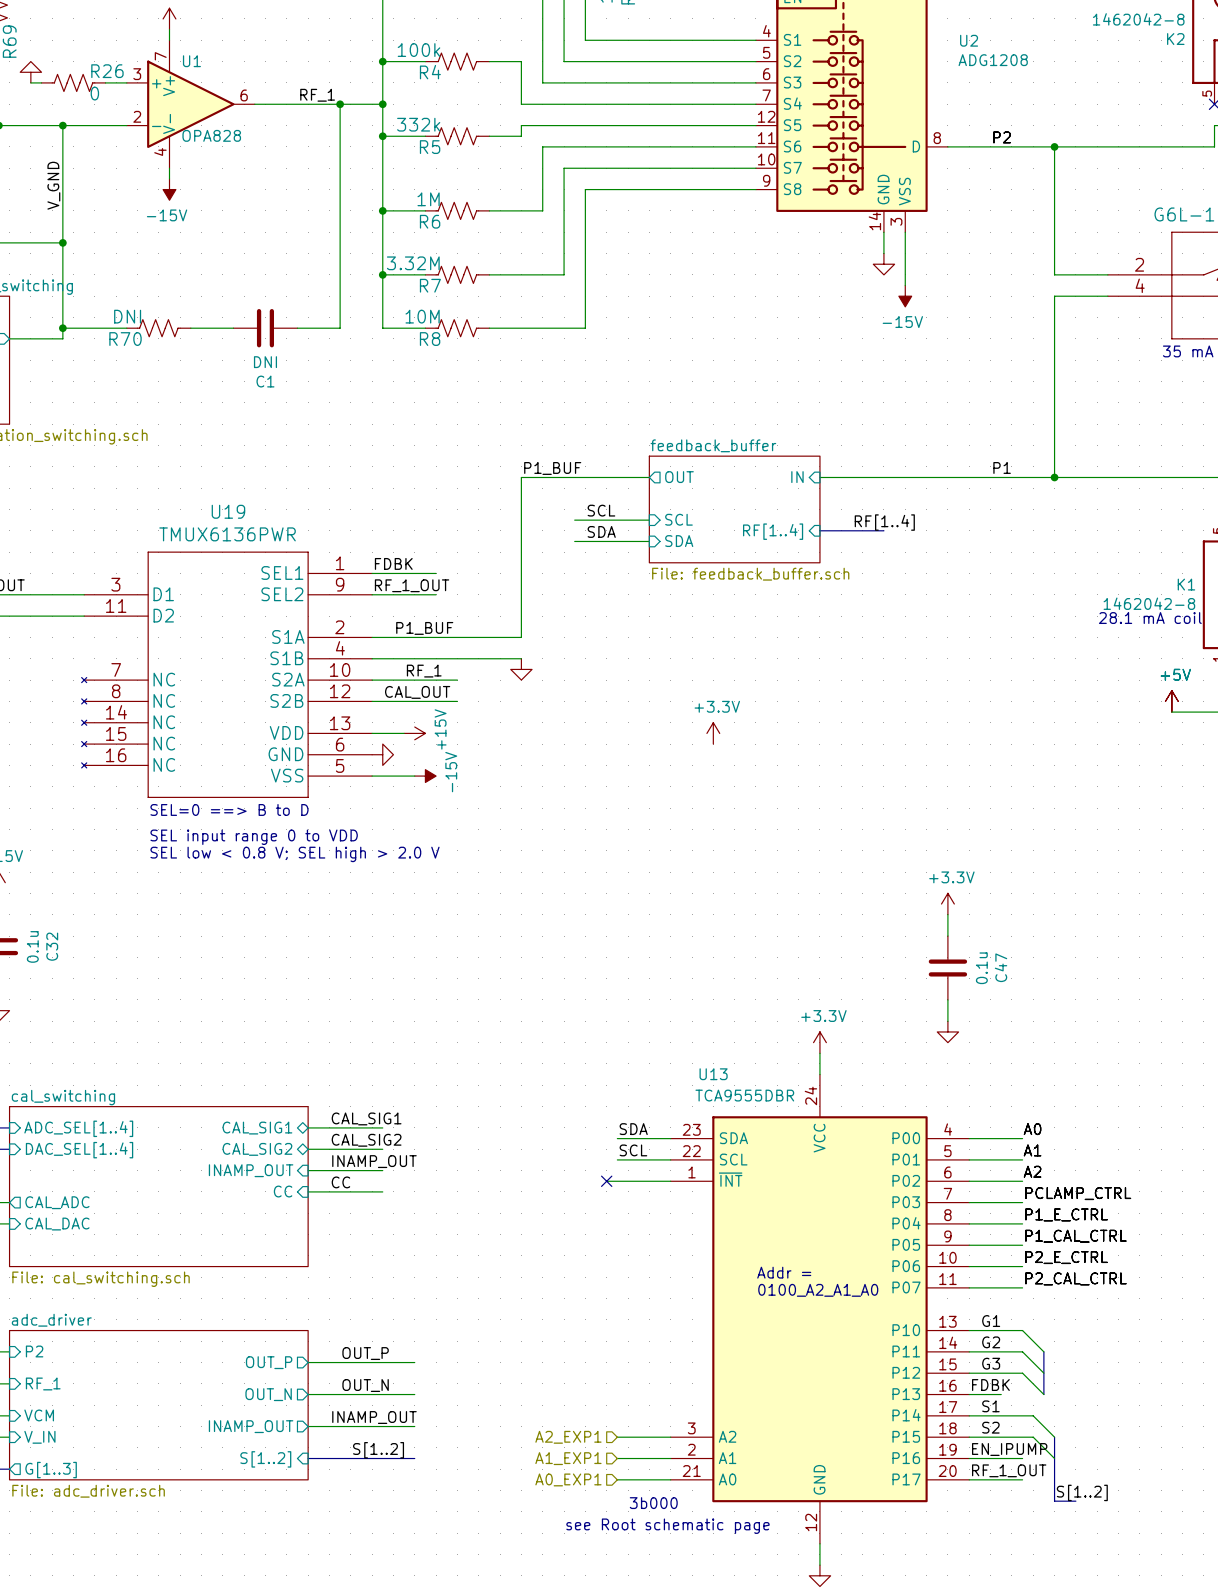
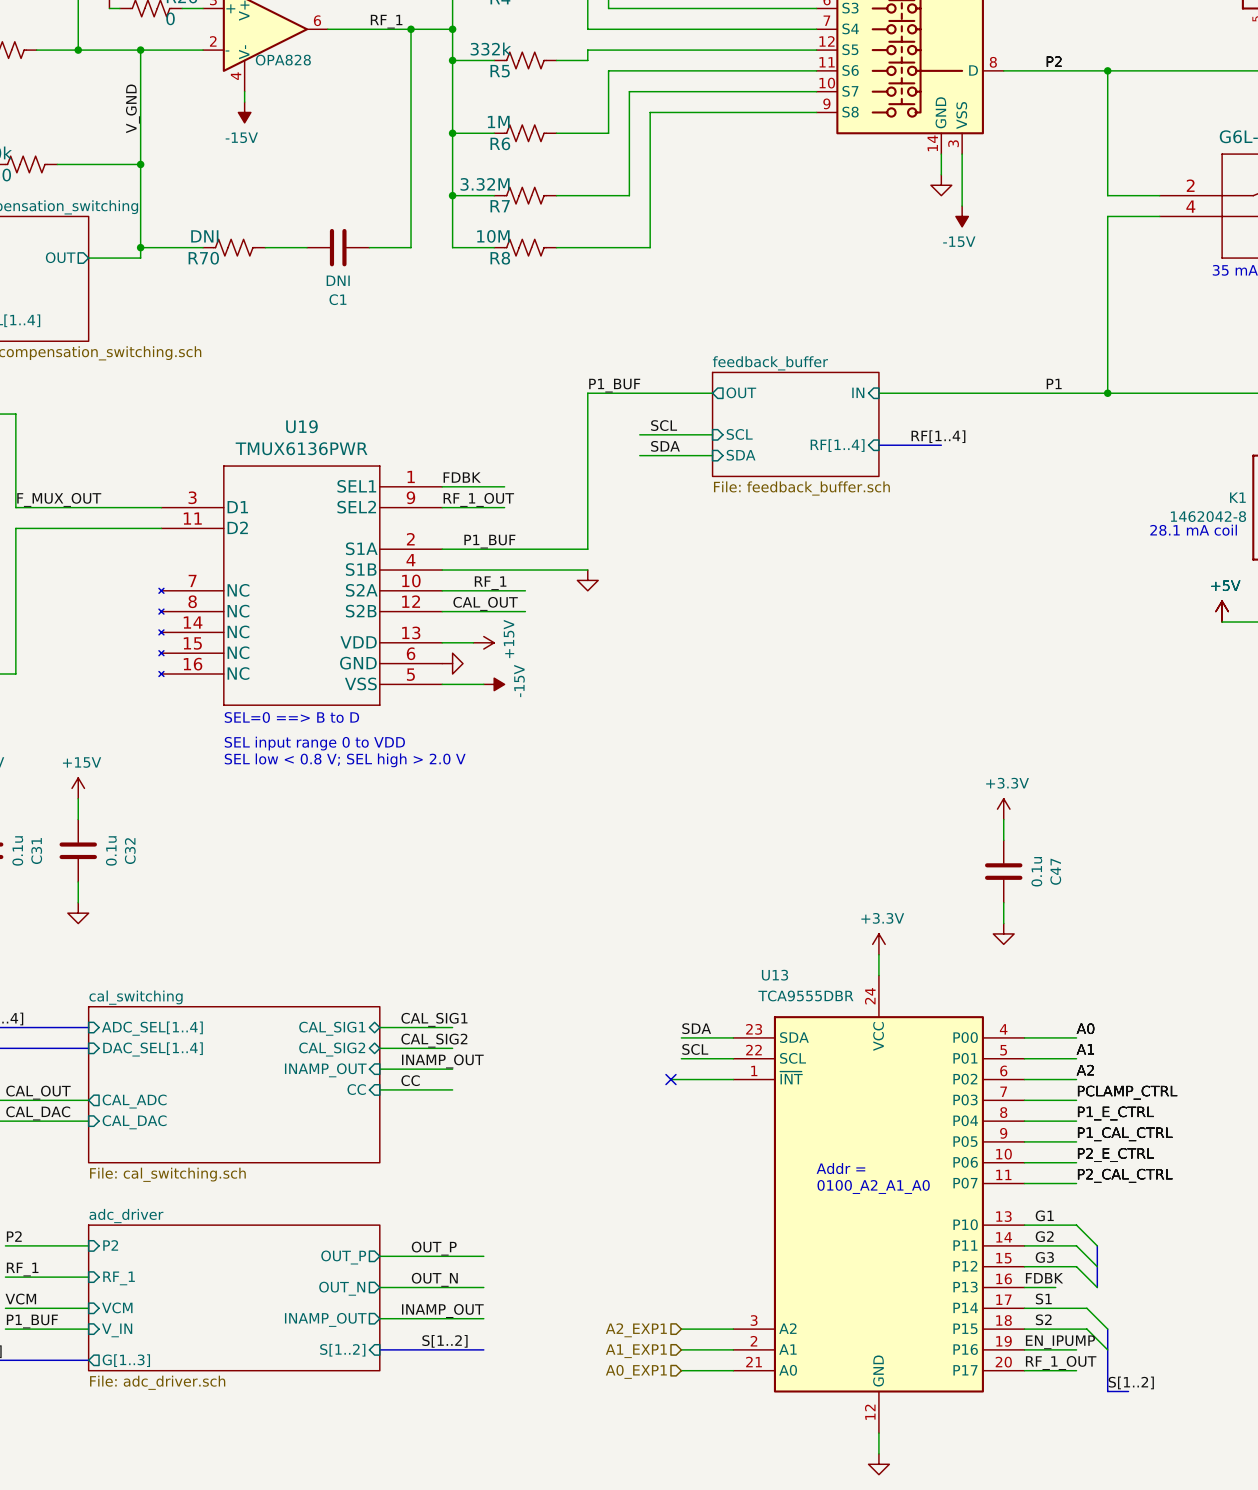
power symbol: +3.3V (713, 733) -> none
text: 3b000 (653, 1503) -> none
text: see Root schematic page (667, 1526) -> none

